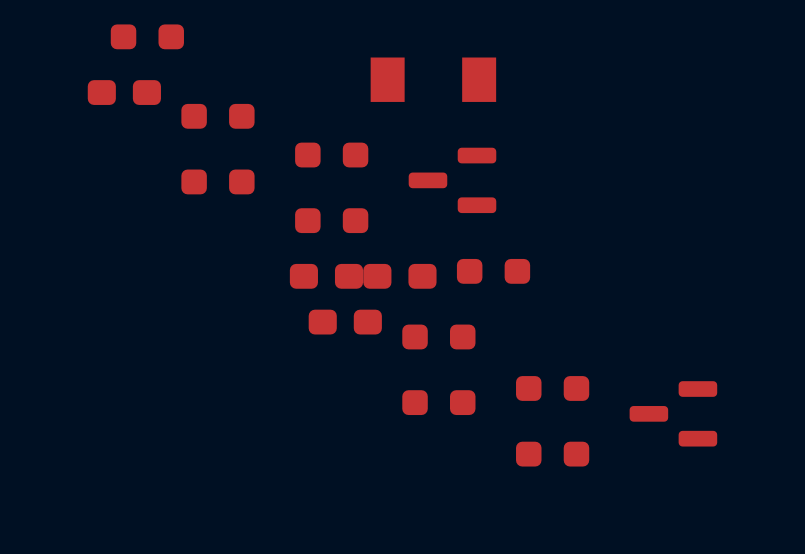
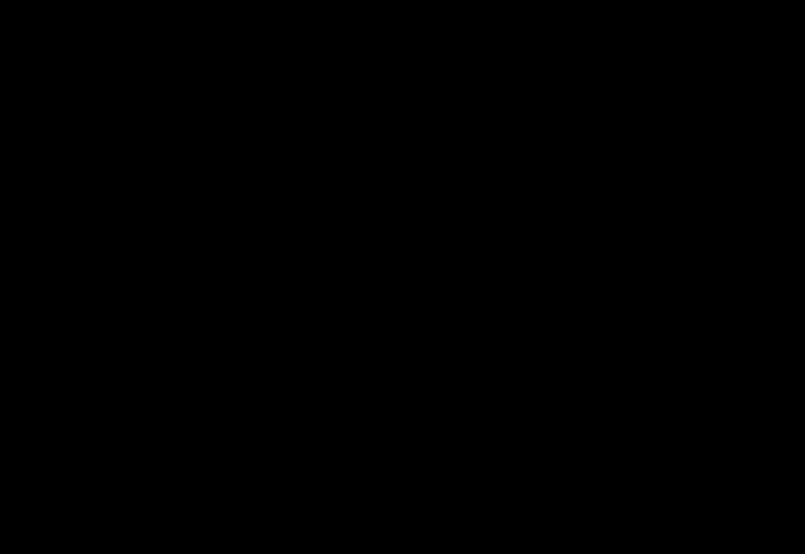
part: (147, 36) -> none
part: (433, 79) -> none
part: (124, 92) -> none
part: (217, 116) -> none
part: (331, 155) -> none
part: (452, 180) -> none
part: (217, 181) -> none
part: (331, 220) -> none
part: (493, 271) -> none
part: (326, 276) -> none
part: (399, 276) -> none
part: (345, 322) -> none
part: (438, 336) -> none
part: (552, 388) -> none
part: (438, 402) -> none
part: (673, 413) -> none
part: (552, 454) -> none

